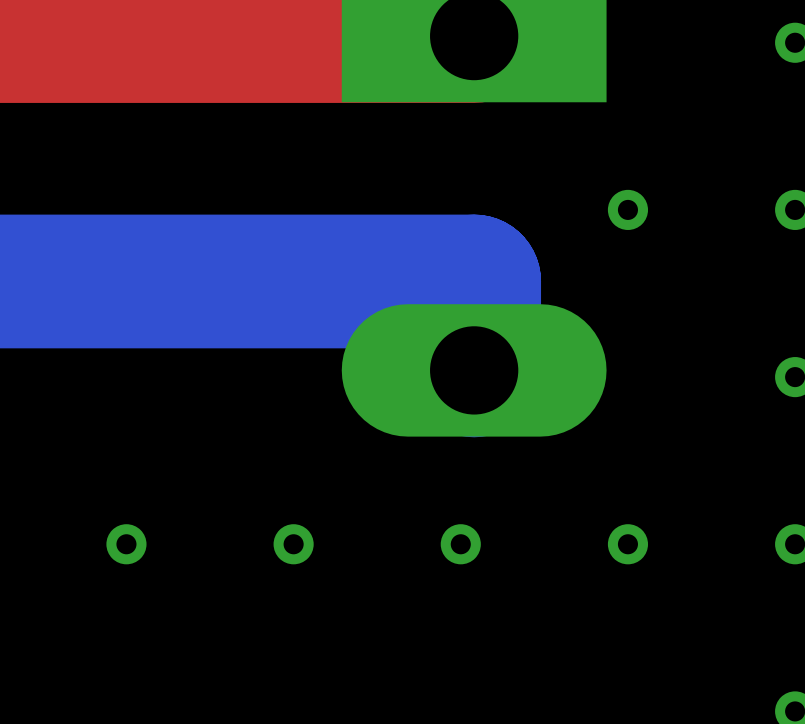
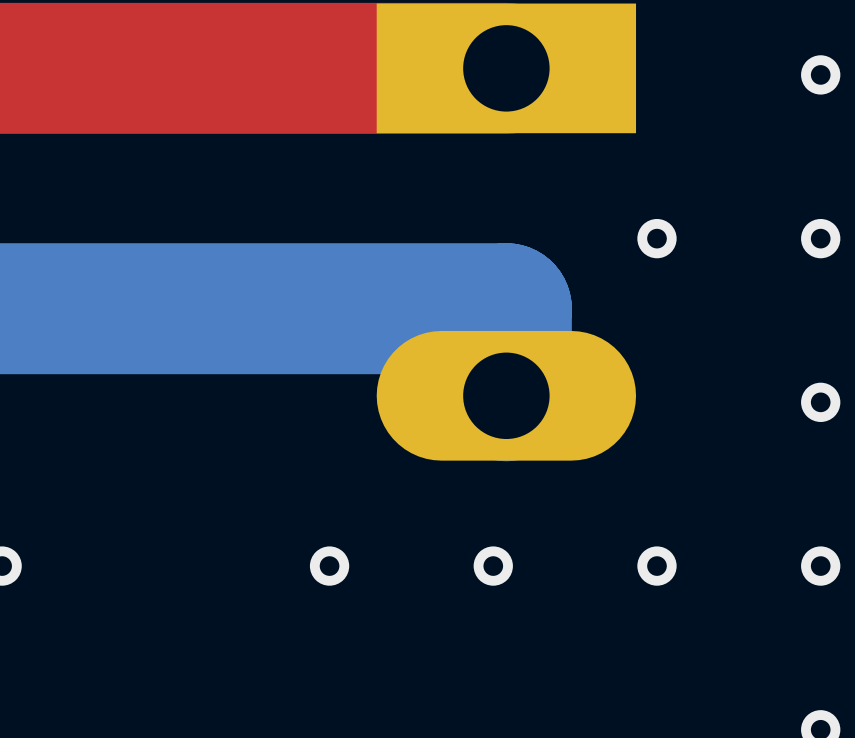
via: (126, 544) -> none

